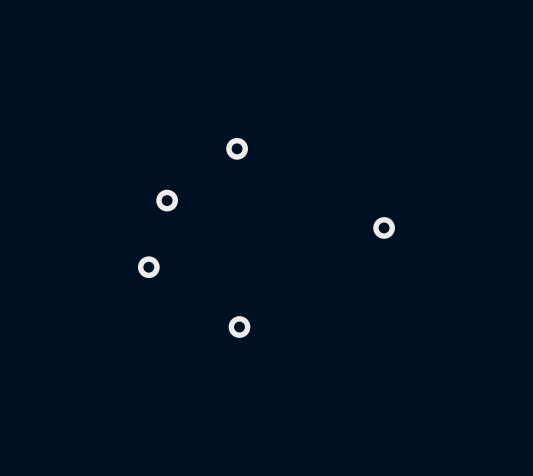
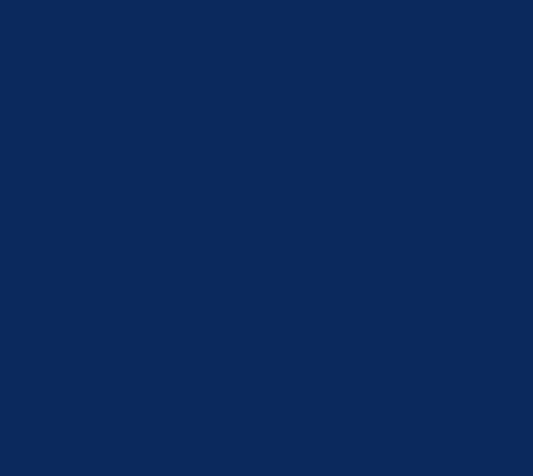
via: (237, 148) -> none
via: (167, 200) -> none
via: (384, 227) -> none
via: (148, 267) -> none
via: (239, 327) -> none

